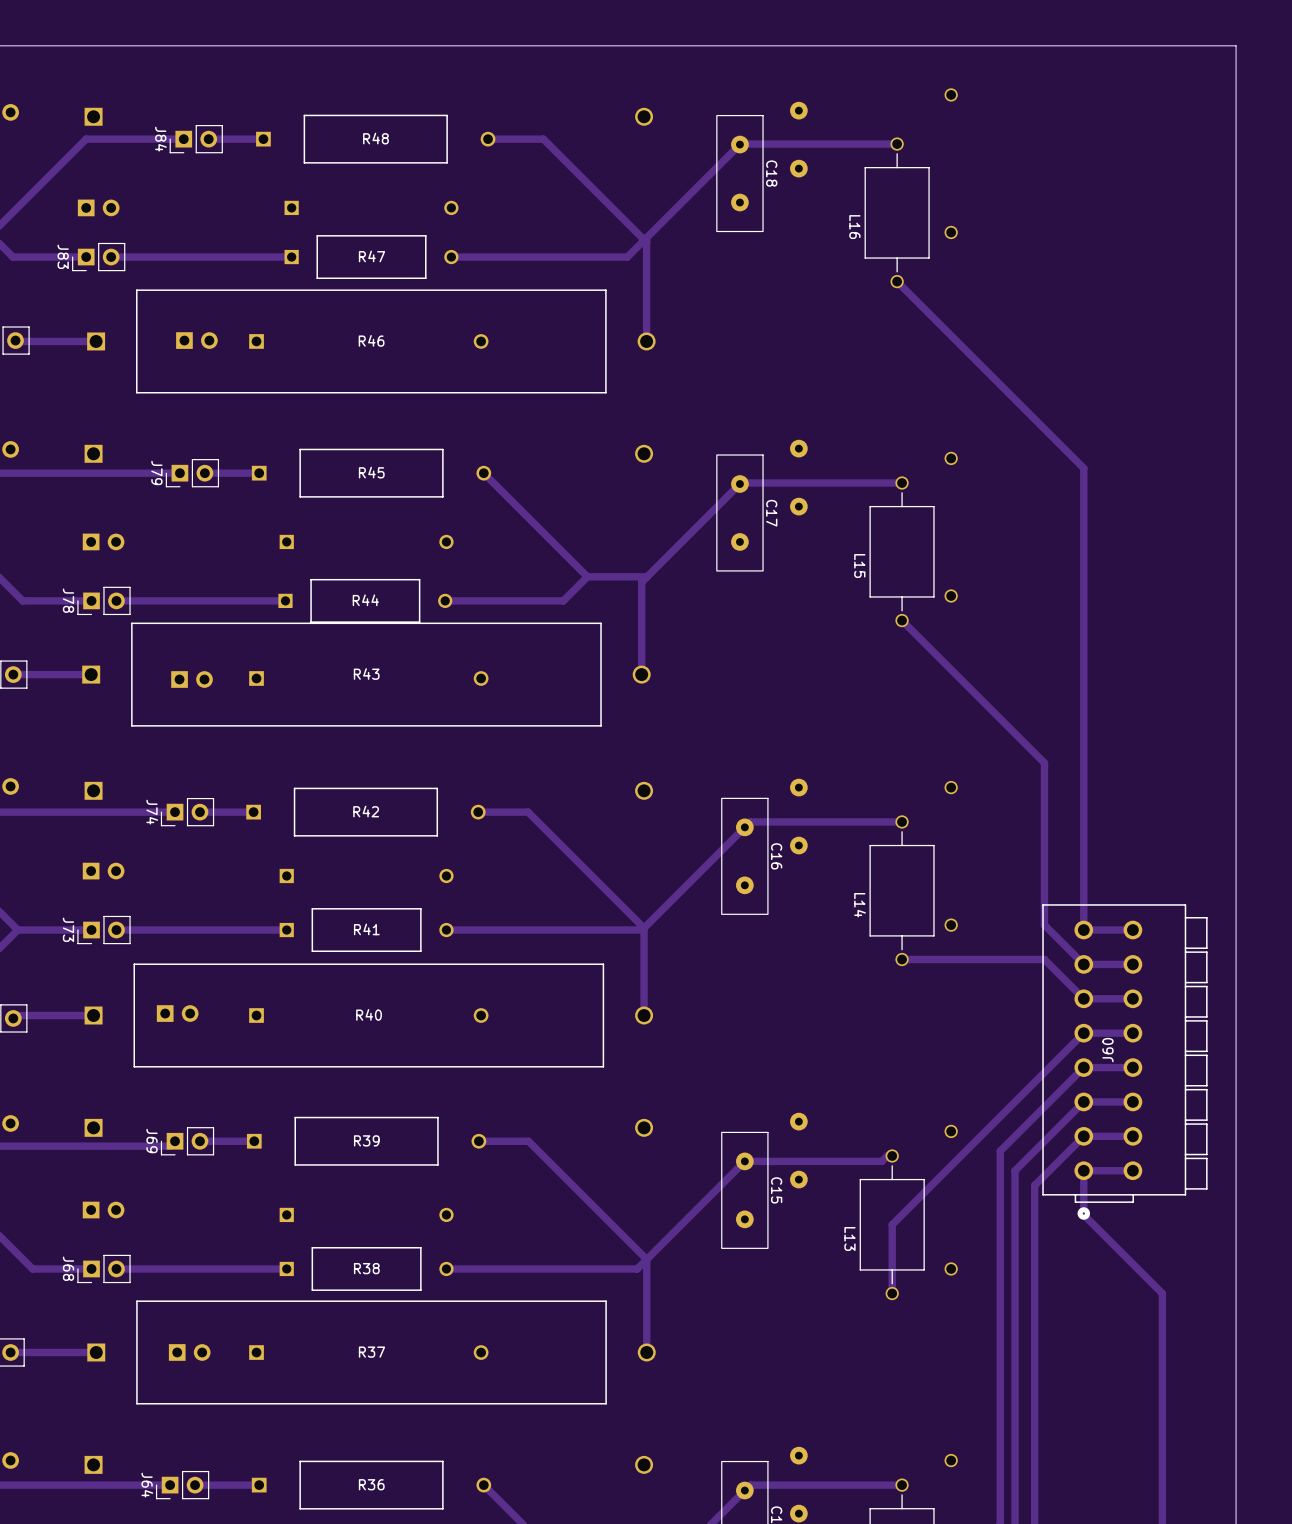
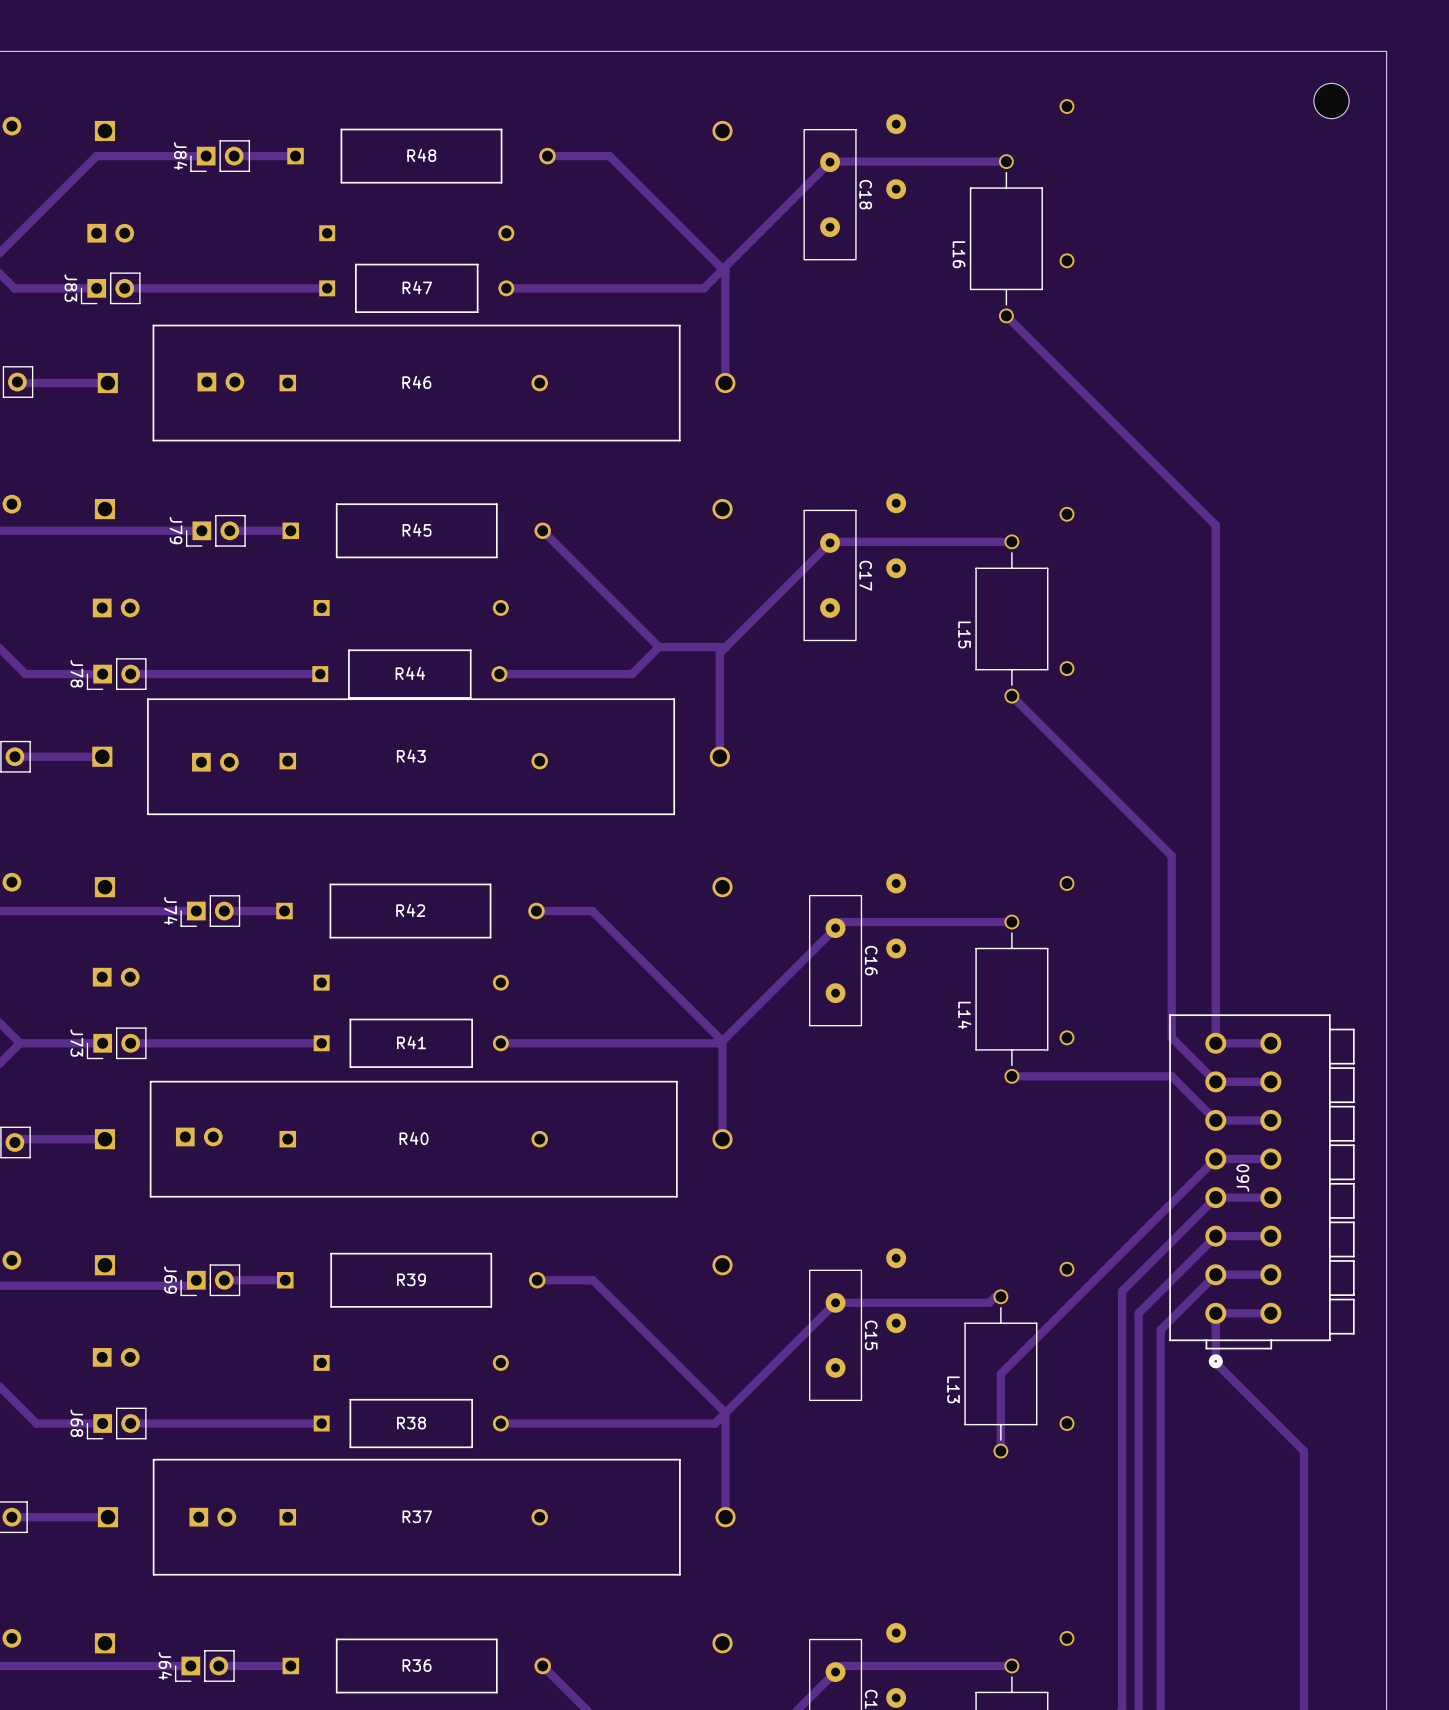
part: none -> (1331, 100)

